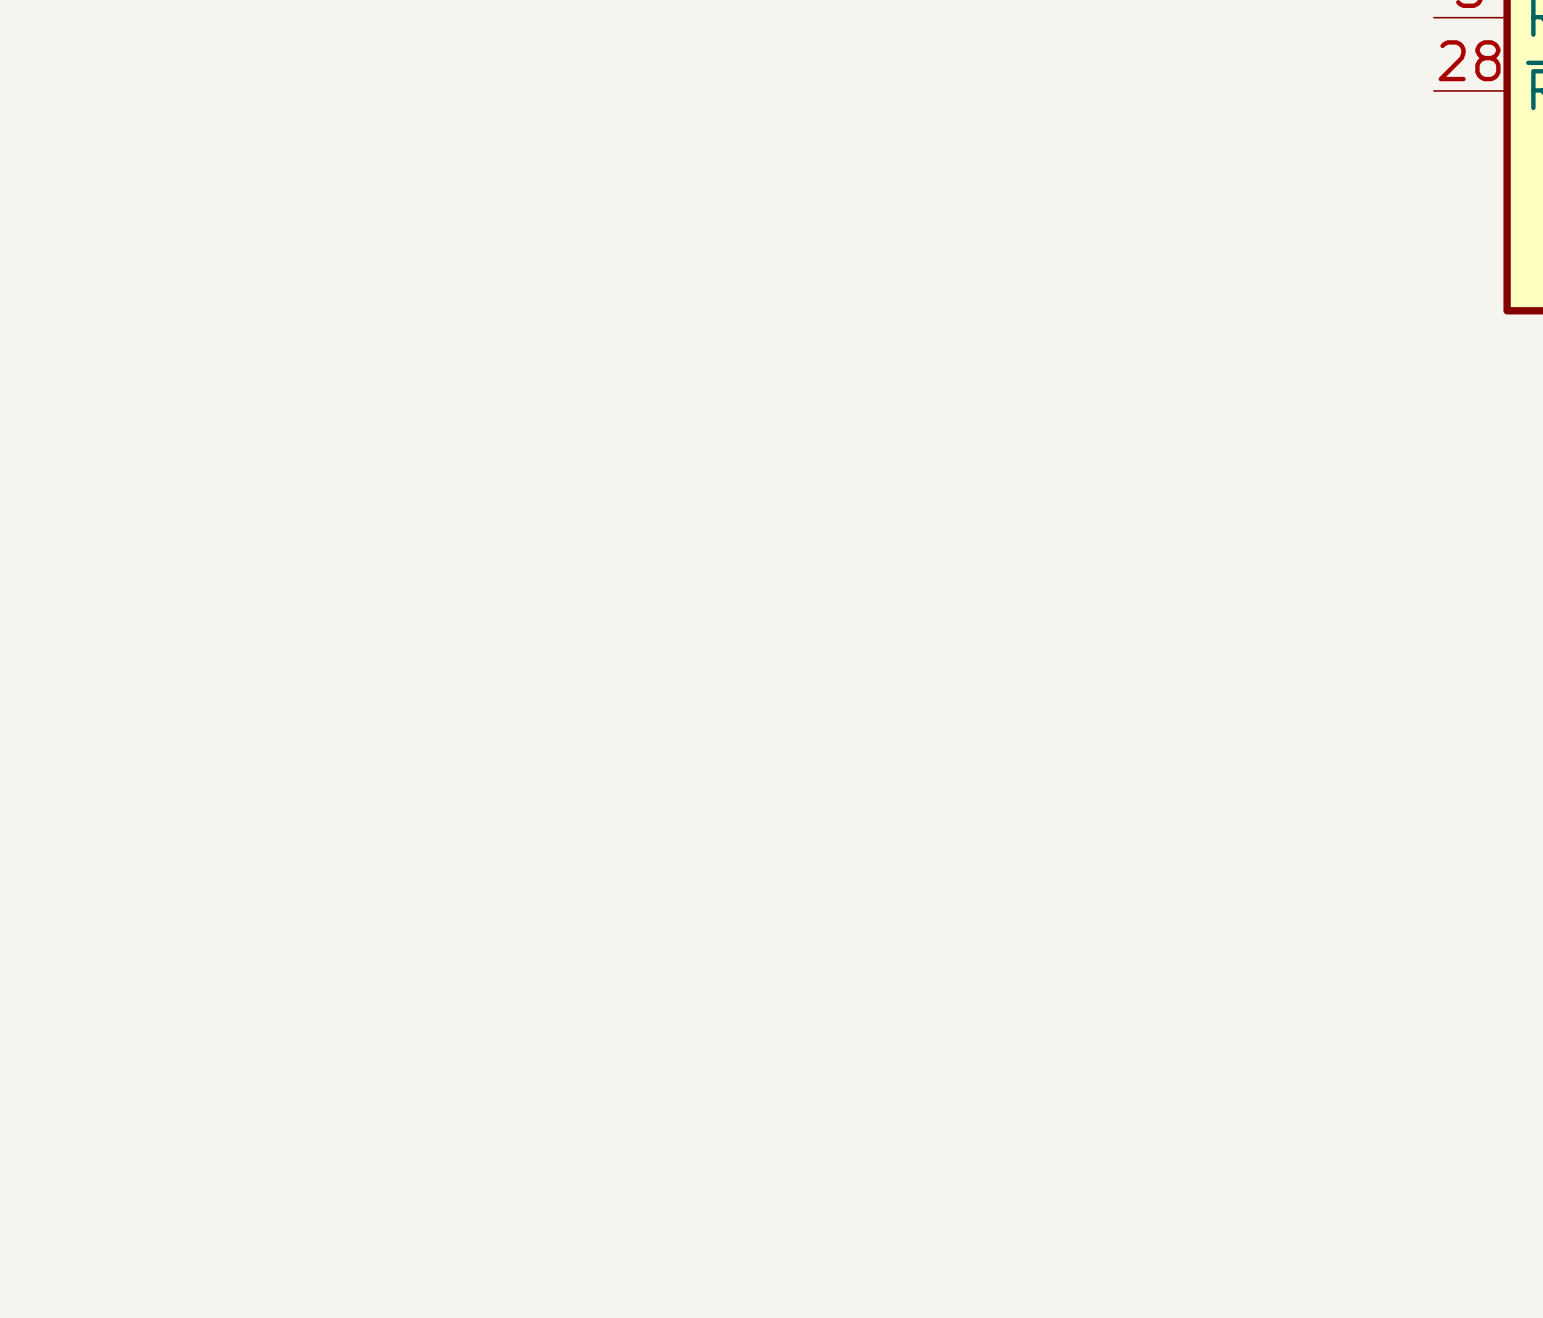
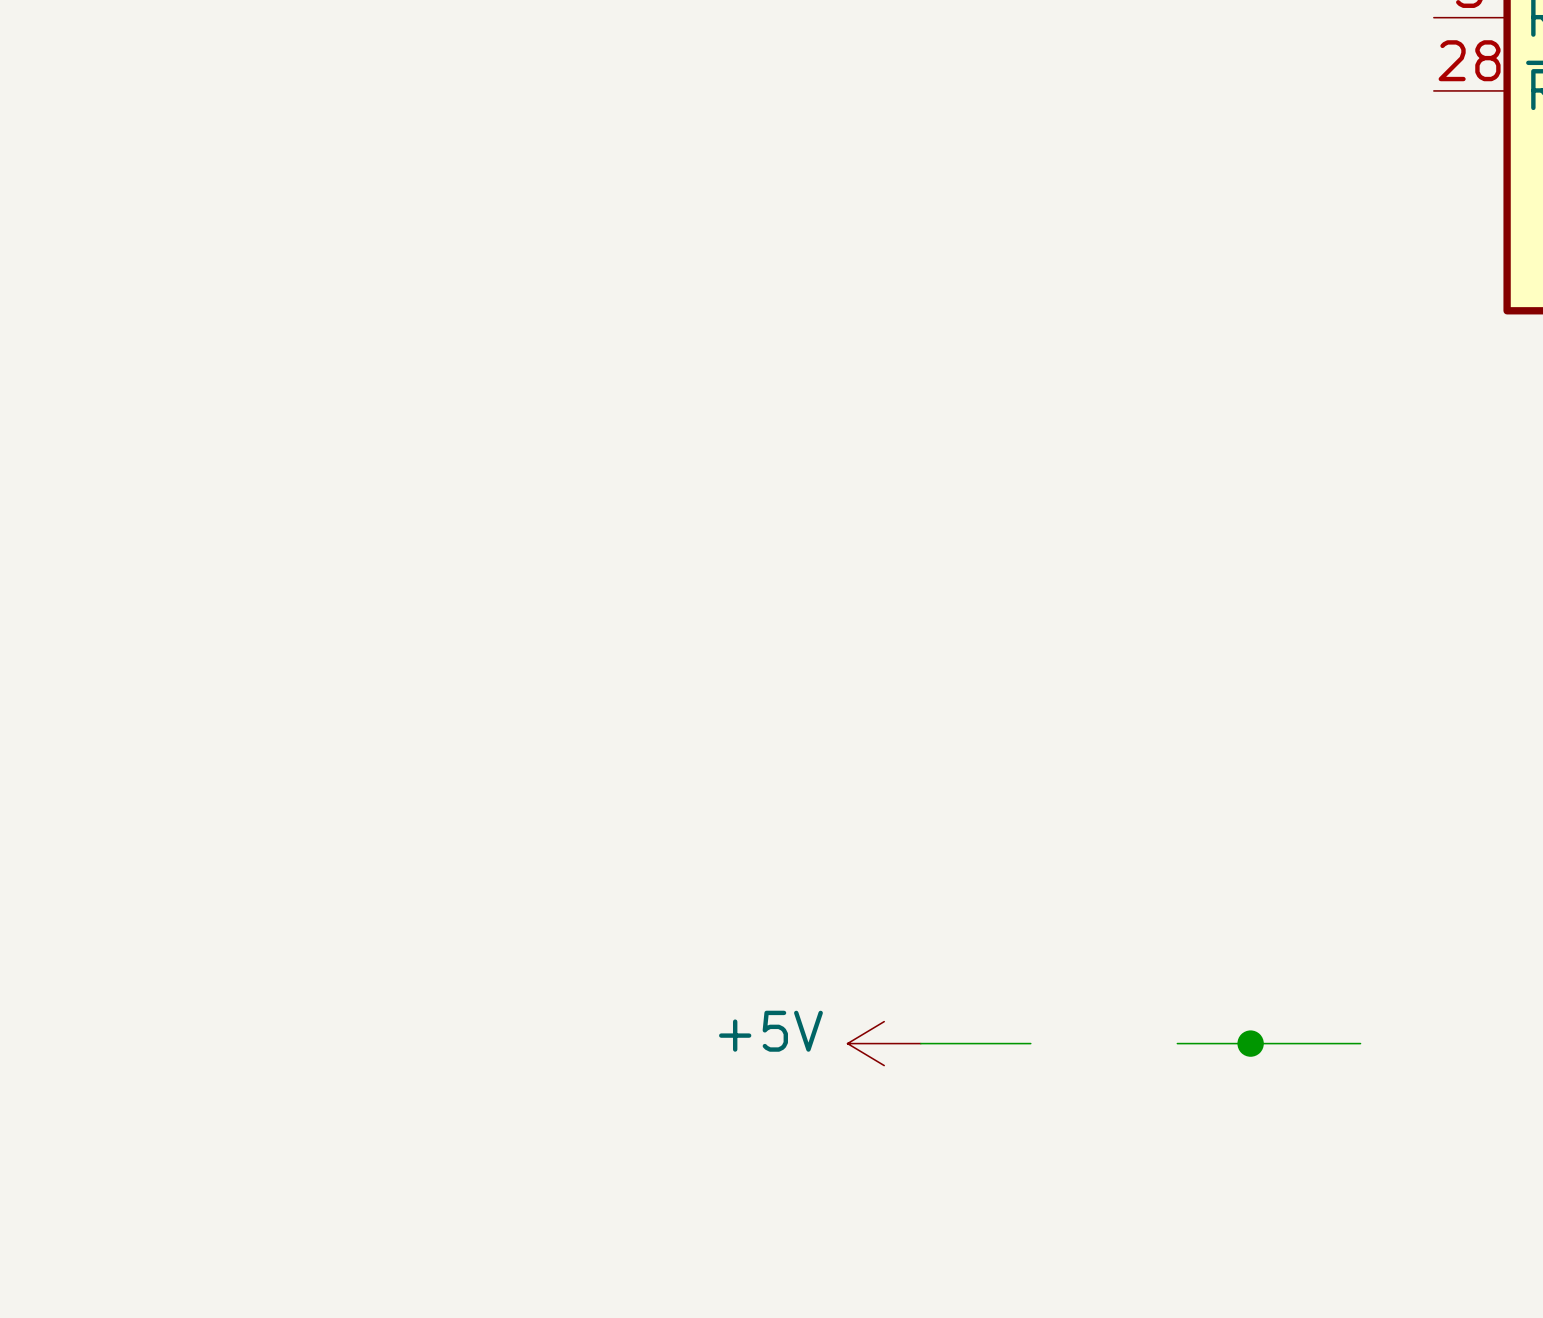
power symbol: none -> +5V (884, 1043)
wire: none -> (920, 1043) (1030, 1043)
wire: none -> (1177, 1043) (1360, 1043)
junction: none -> (1250, 1043)

